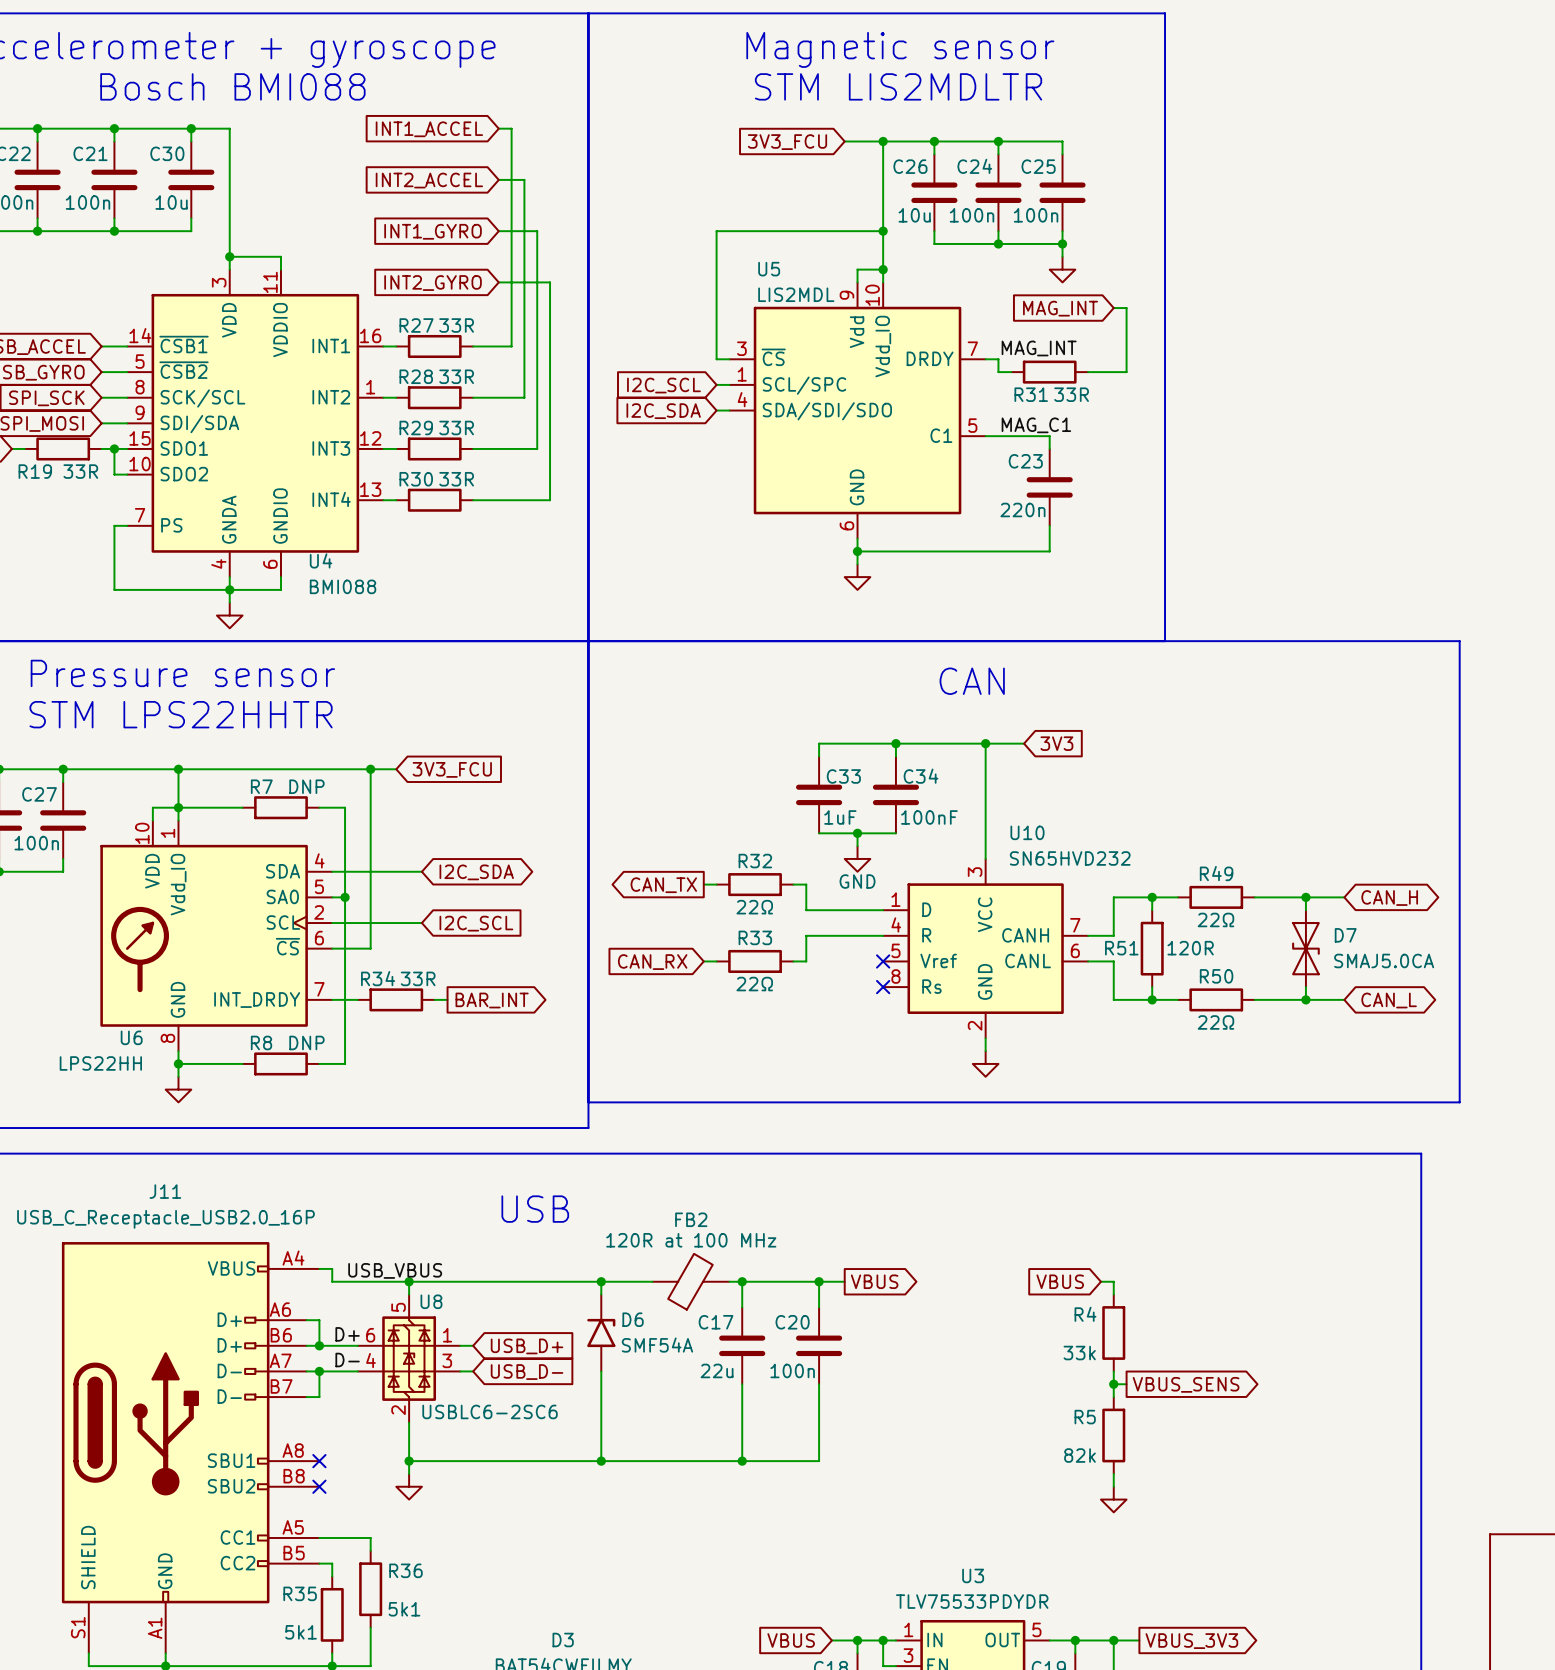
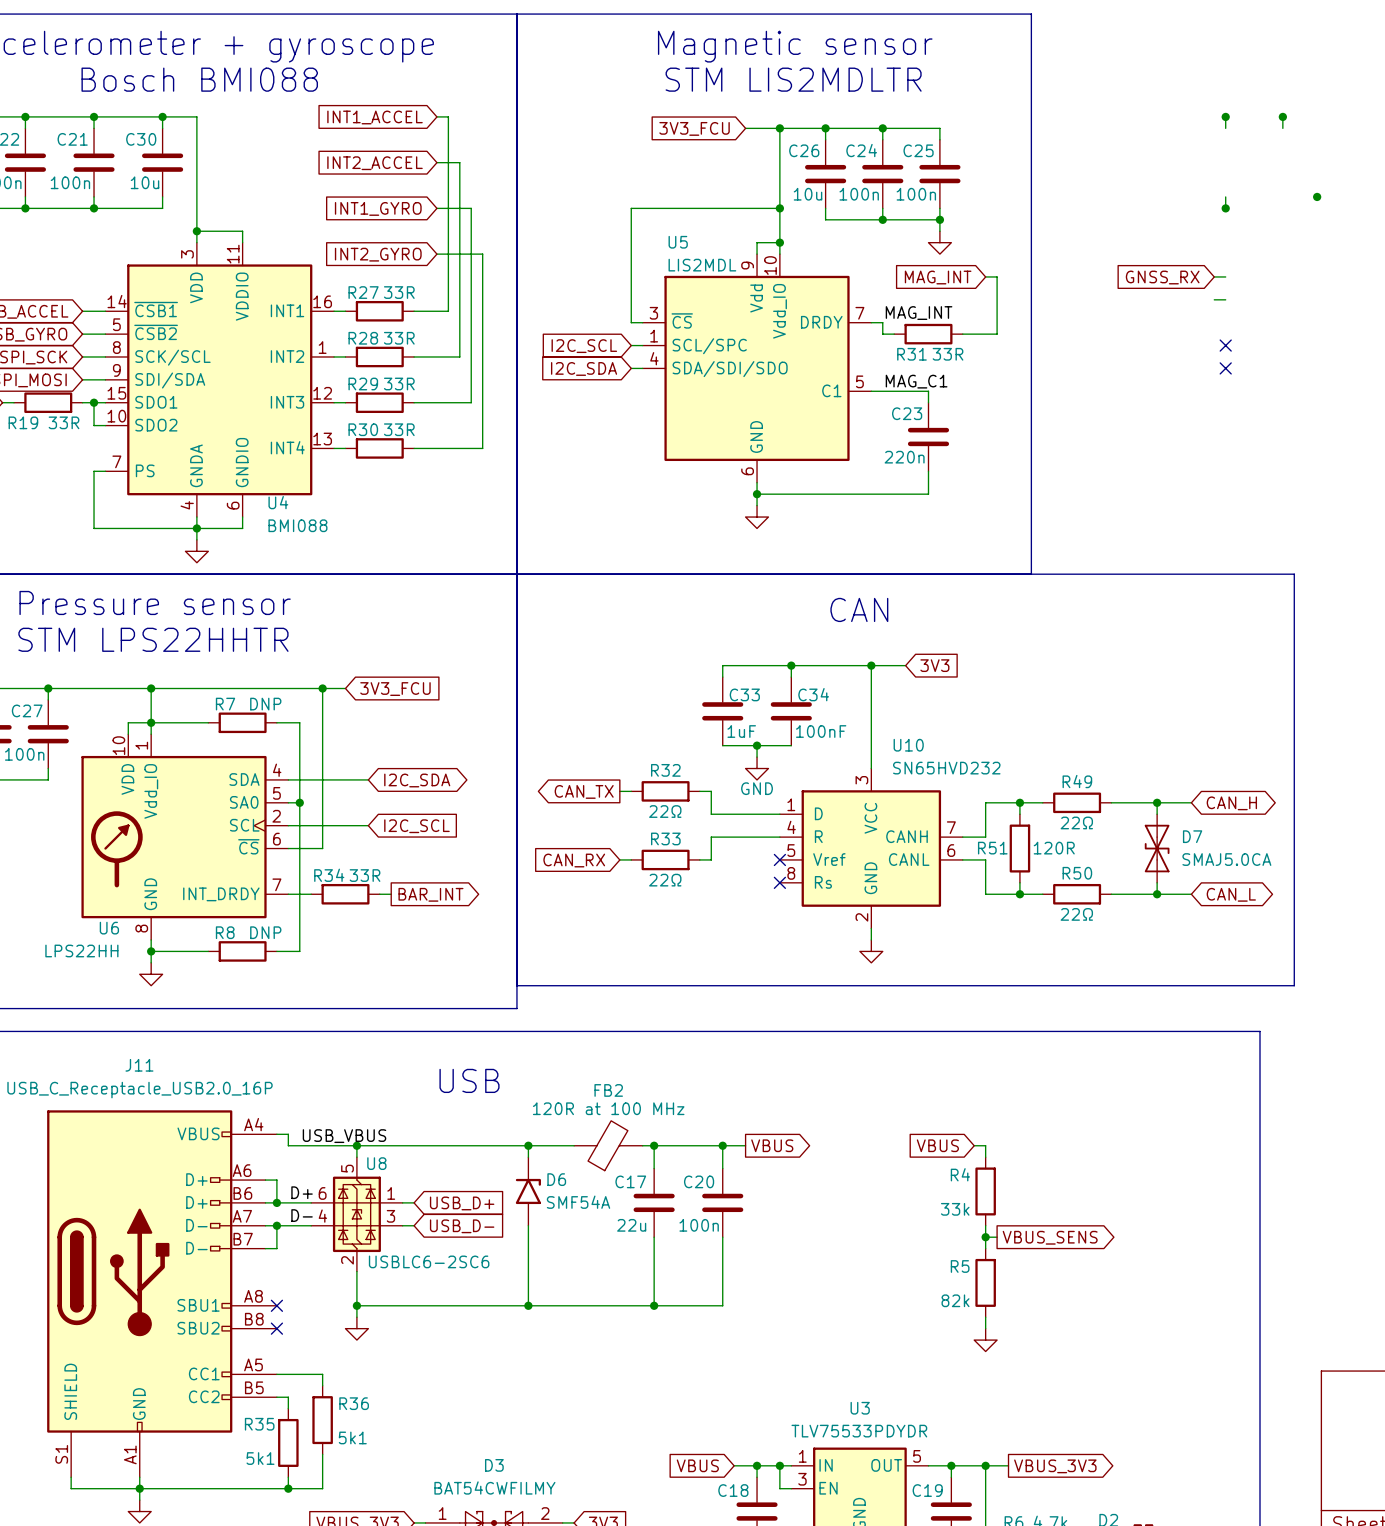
wire: none -> (1225, 116) (1225, 128)
junction: none -> (1225, 116)
wire: none -> (1282, 116) (1282, 128)
junction: none -> (1282, 116)
wire: none -> (1225, 196) (1225, 208)
junction: none -> (1317, 196)
junction: none -> (1225, 208)
global label: none -> GNSS_RX (1162, 277)
wire: none -> (1214, 276) (1225, 276)
wire: none -> (1214, 299) (1225, 299)
no-connect mark: none -> (1225, 345)
no-connect mark: none -> (1225, 368)

